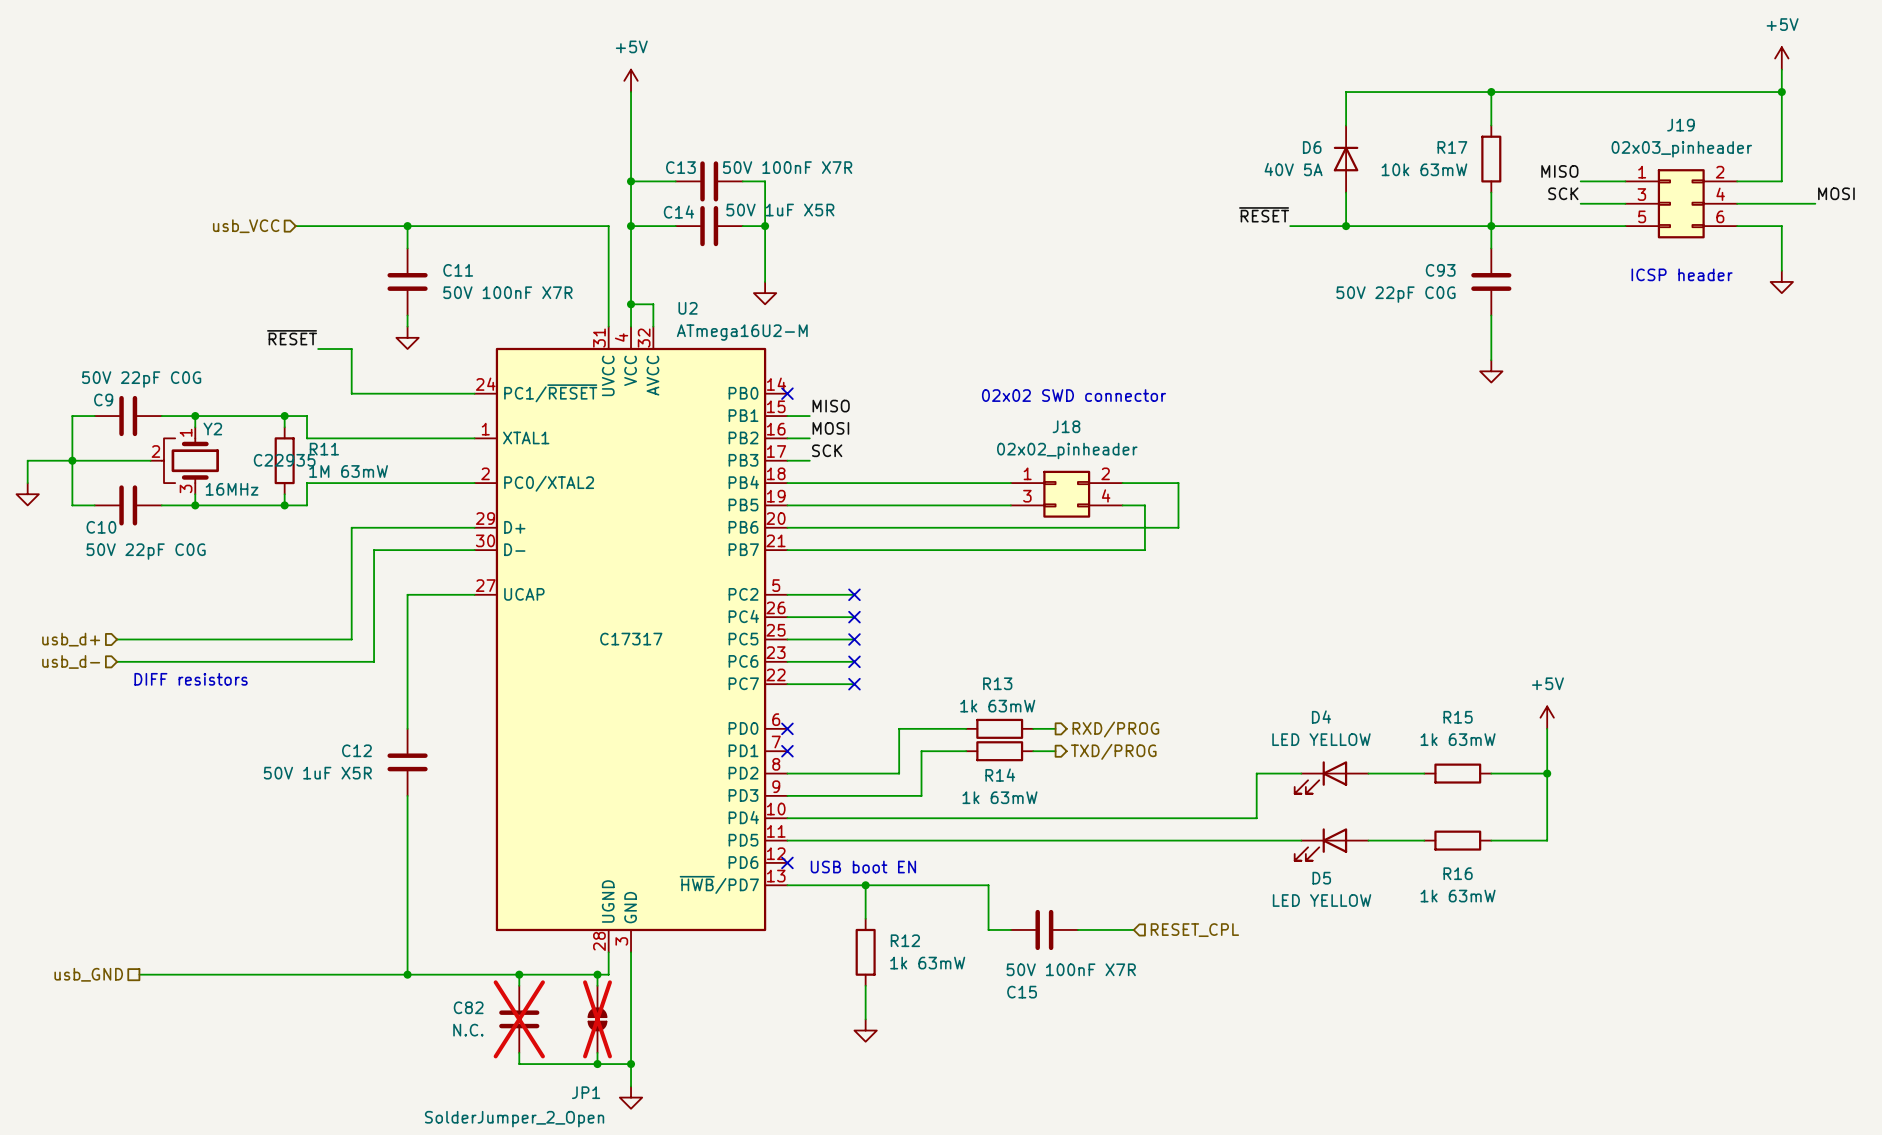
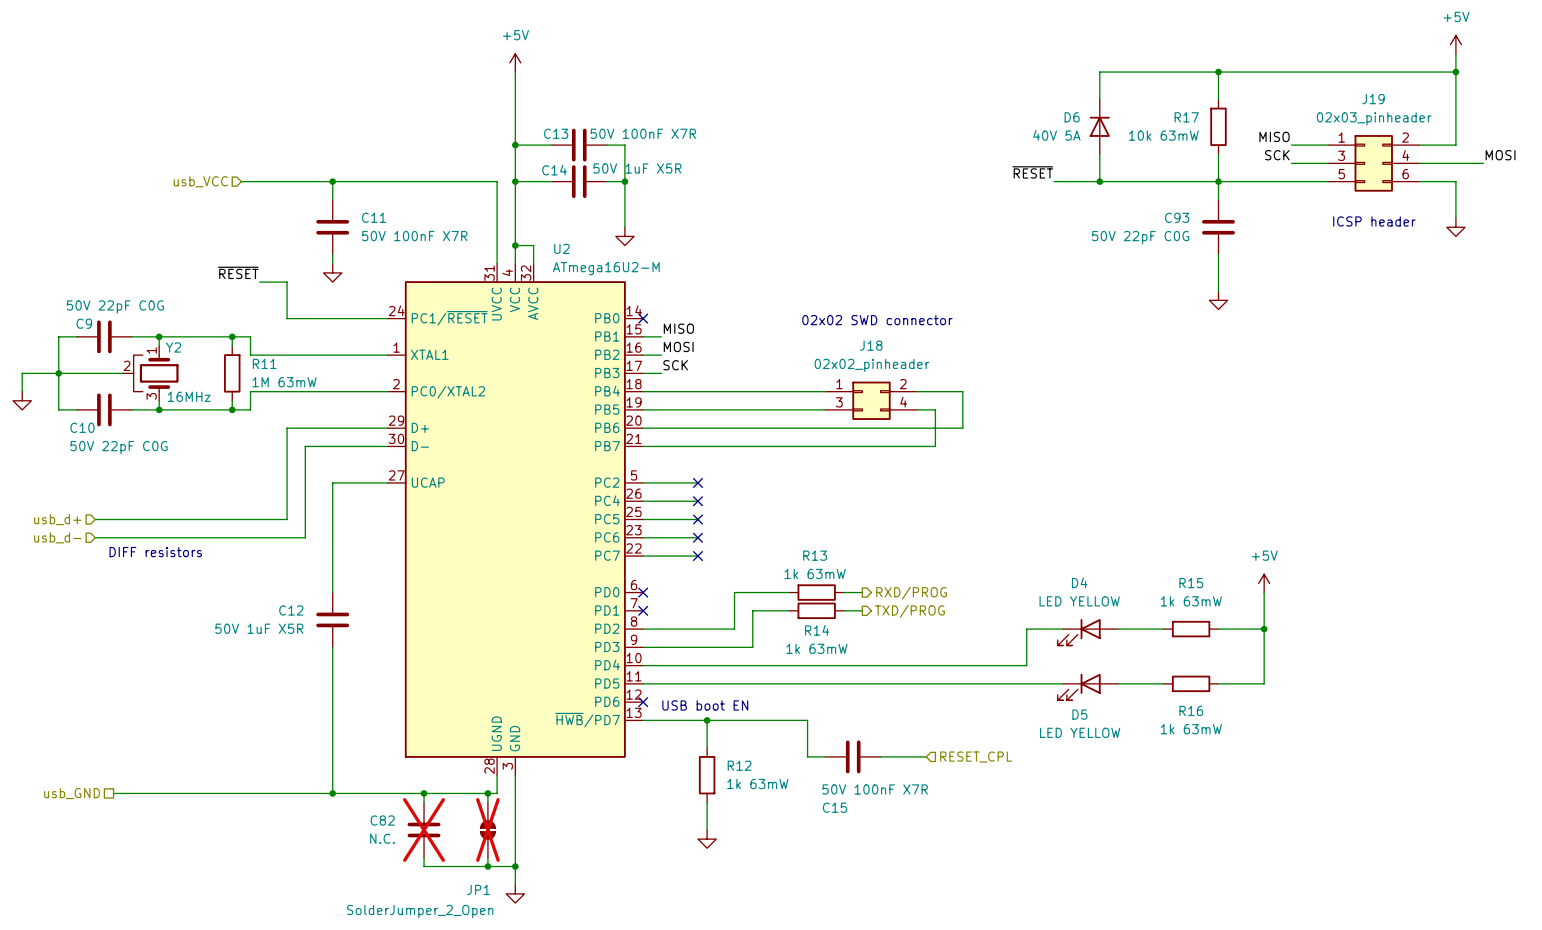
R11 text: C22935 (284, 460) -> none
U2 text: C17317 (631, 639) -> none

